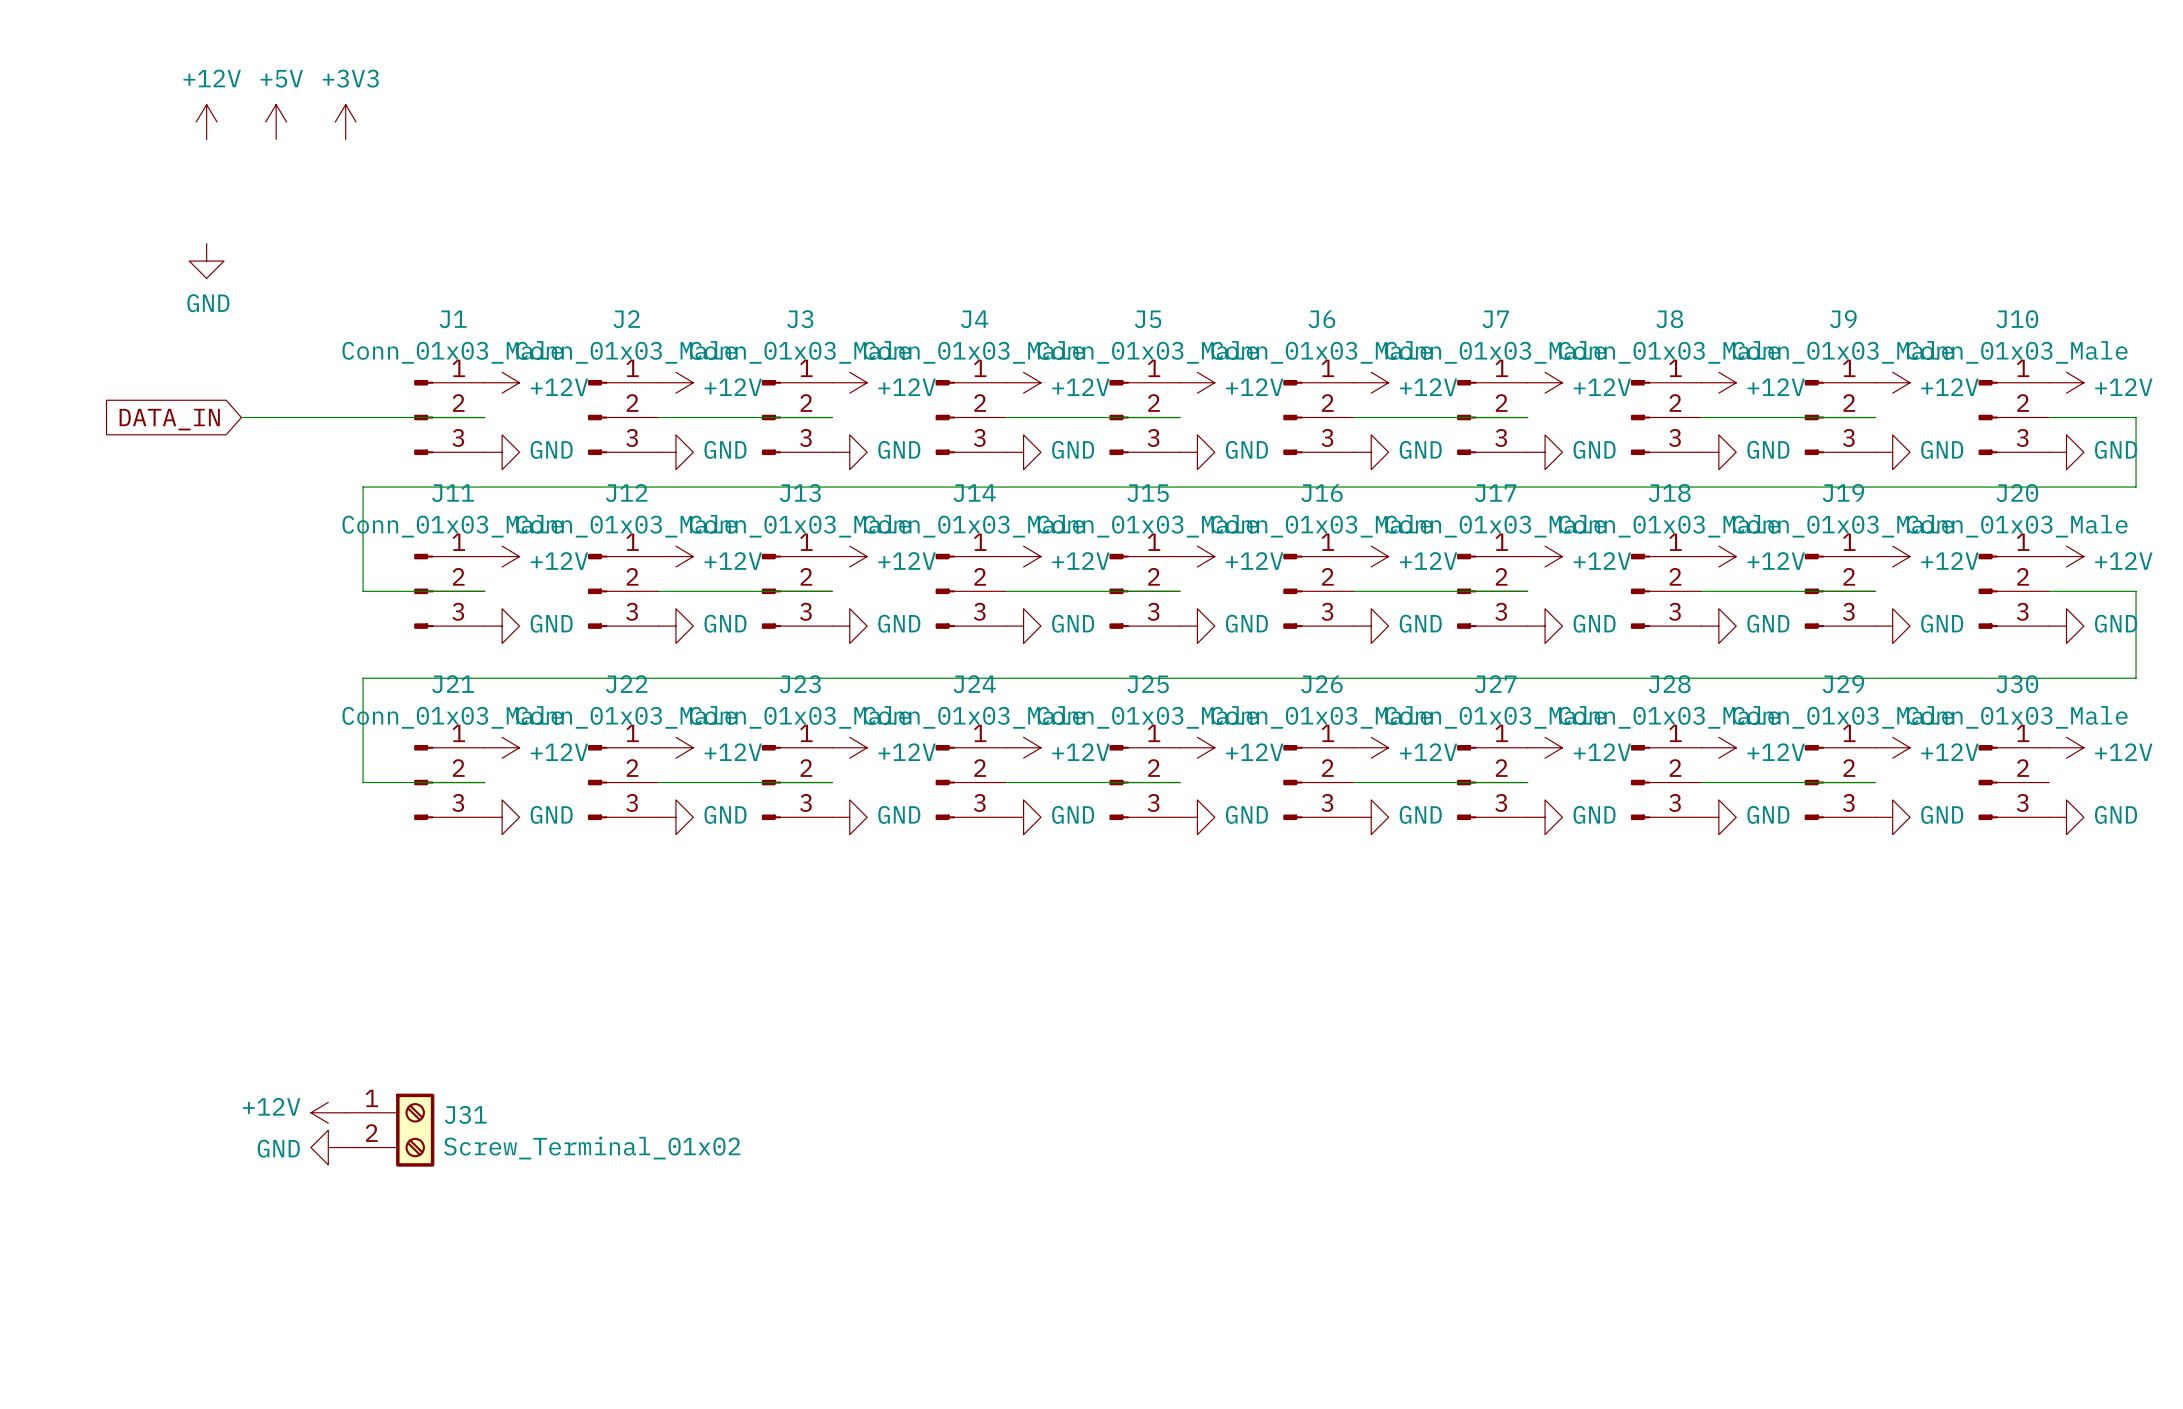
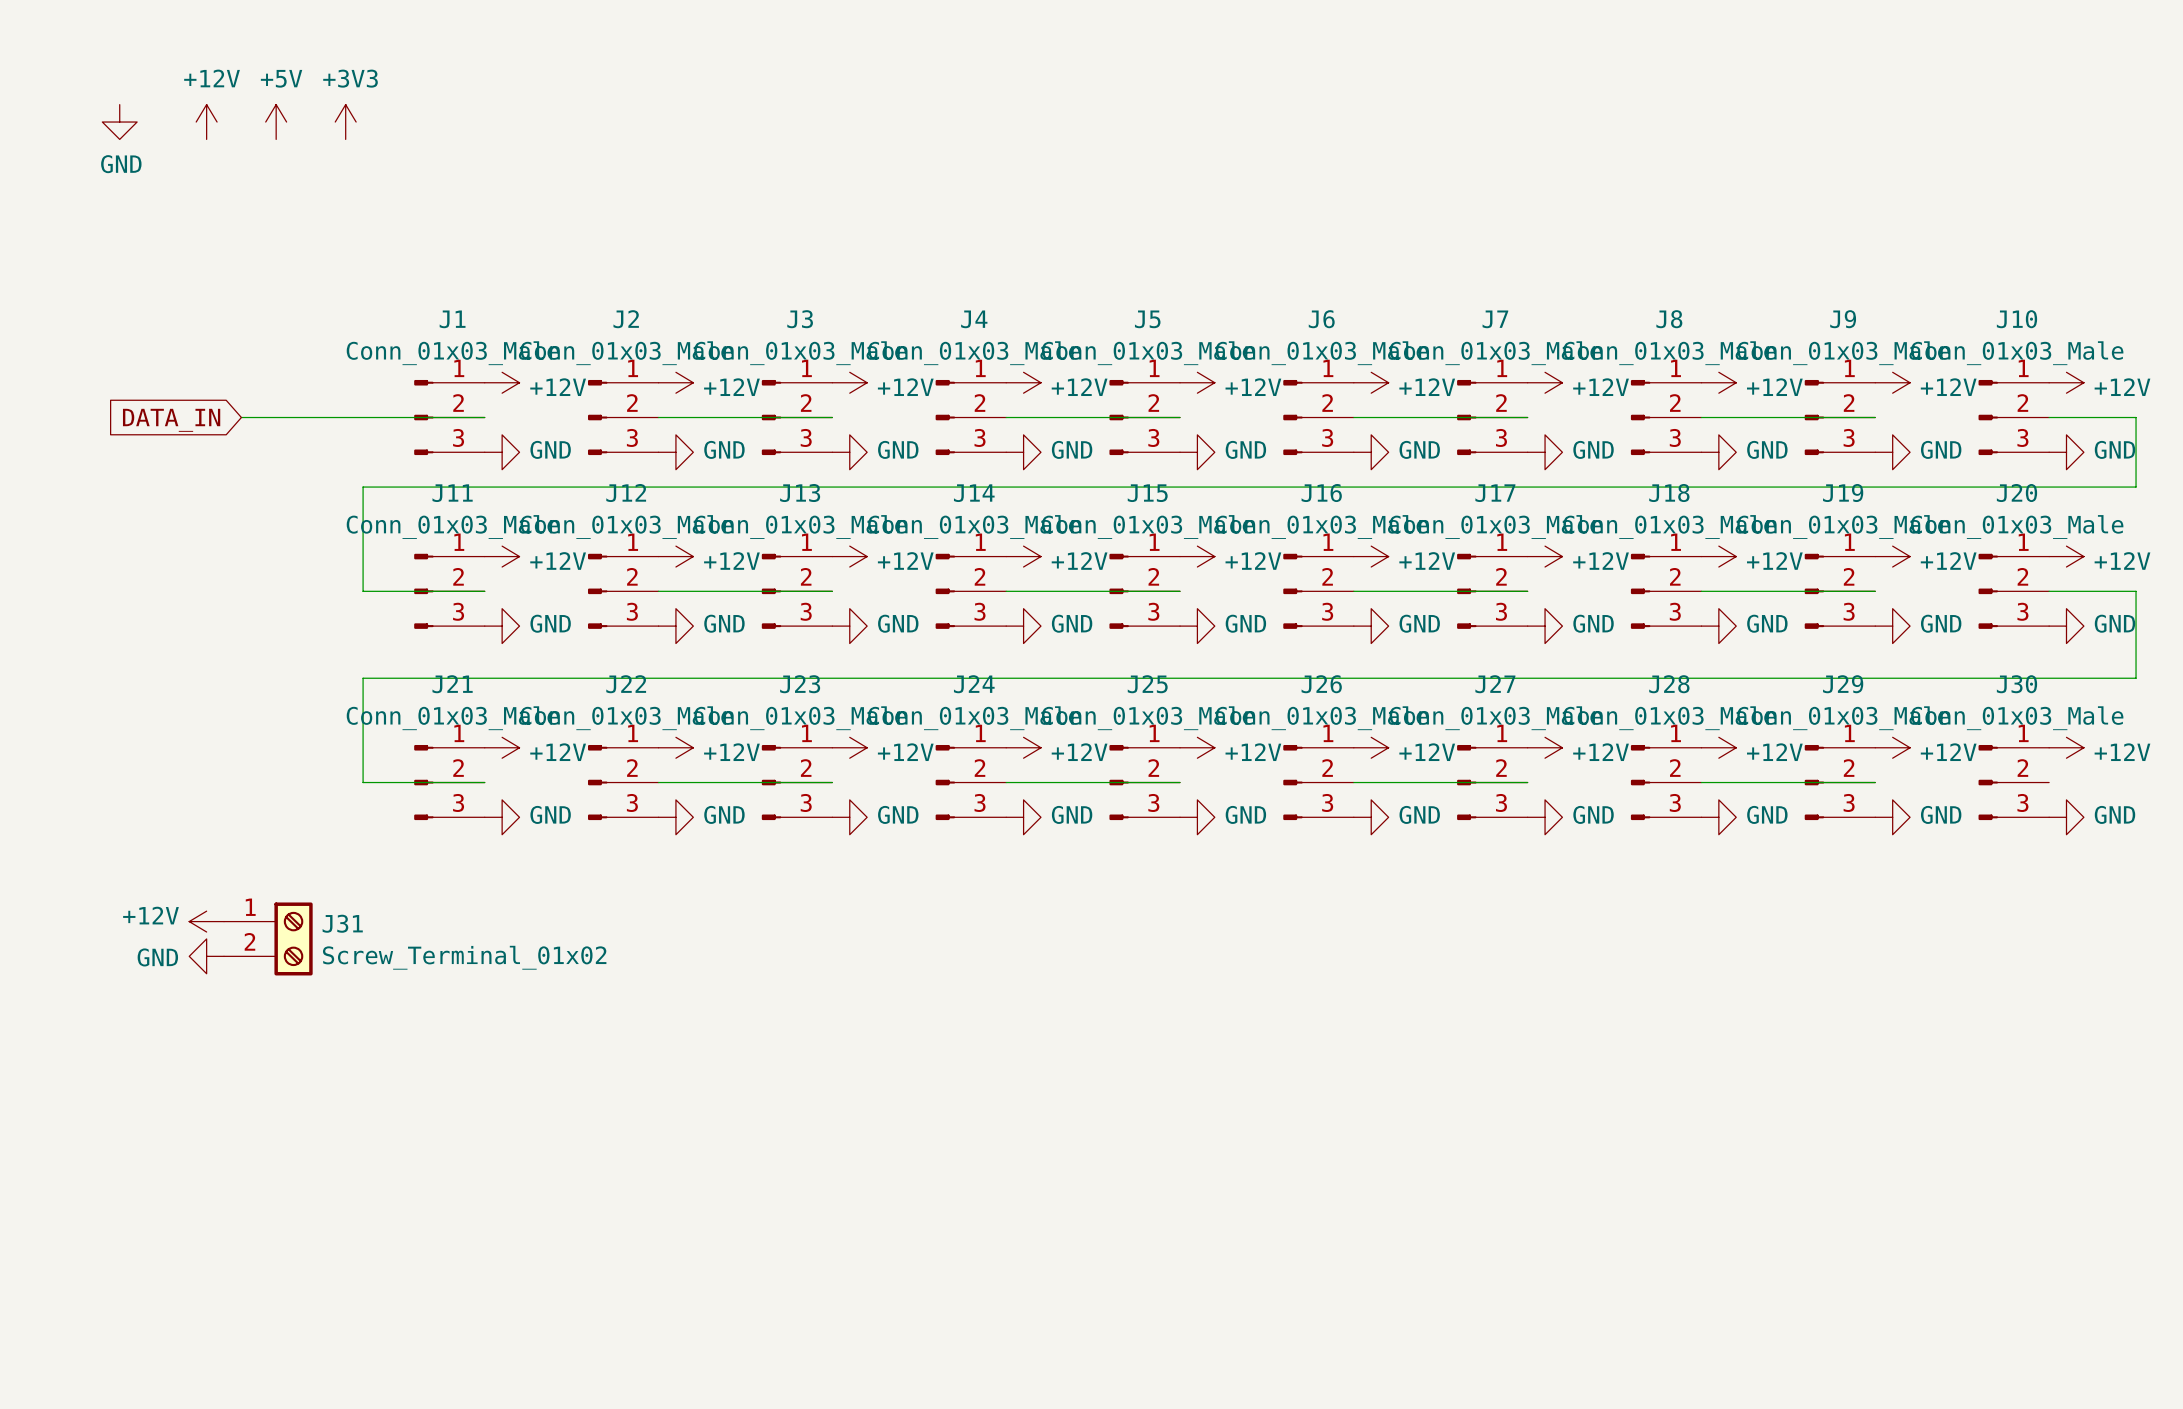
power symbol position: GND (206, 261) -> GND (119, 122)
power symbol position: +12V (328, 1112) -> +12V (206, 921)
J31 position: (390, 1130) -> (268, 938)
power symbol position: GND (328, 1147) -> GND (206, 956)

